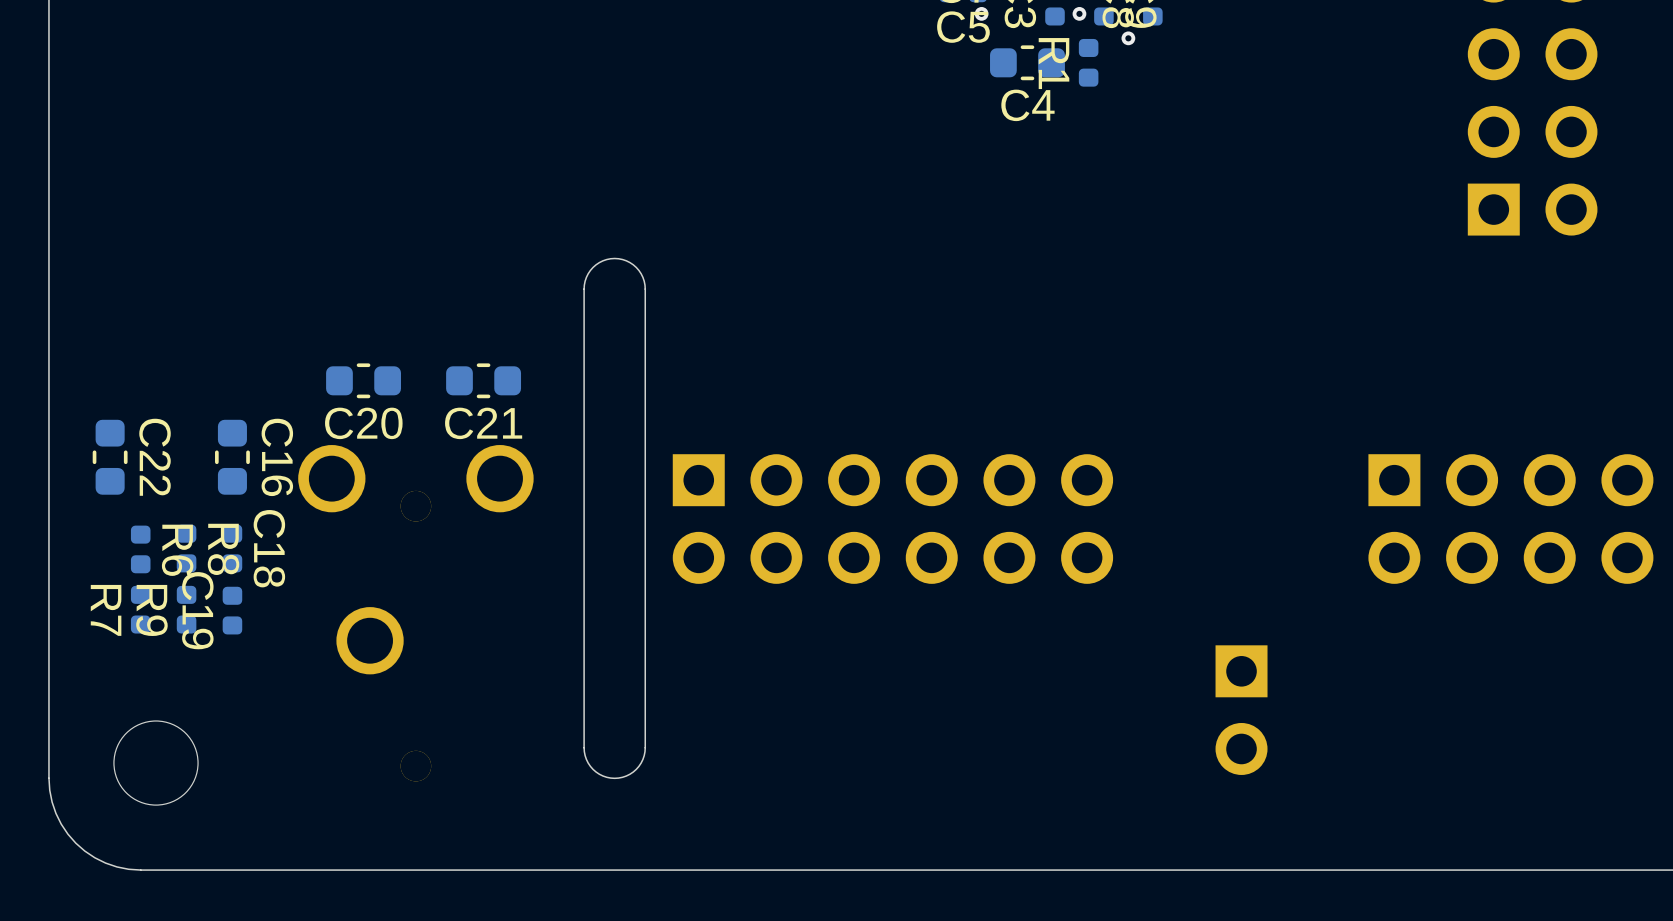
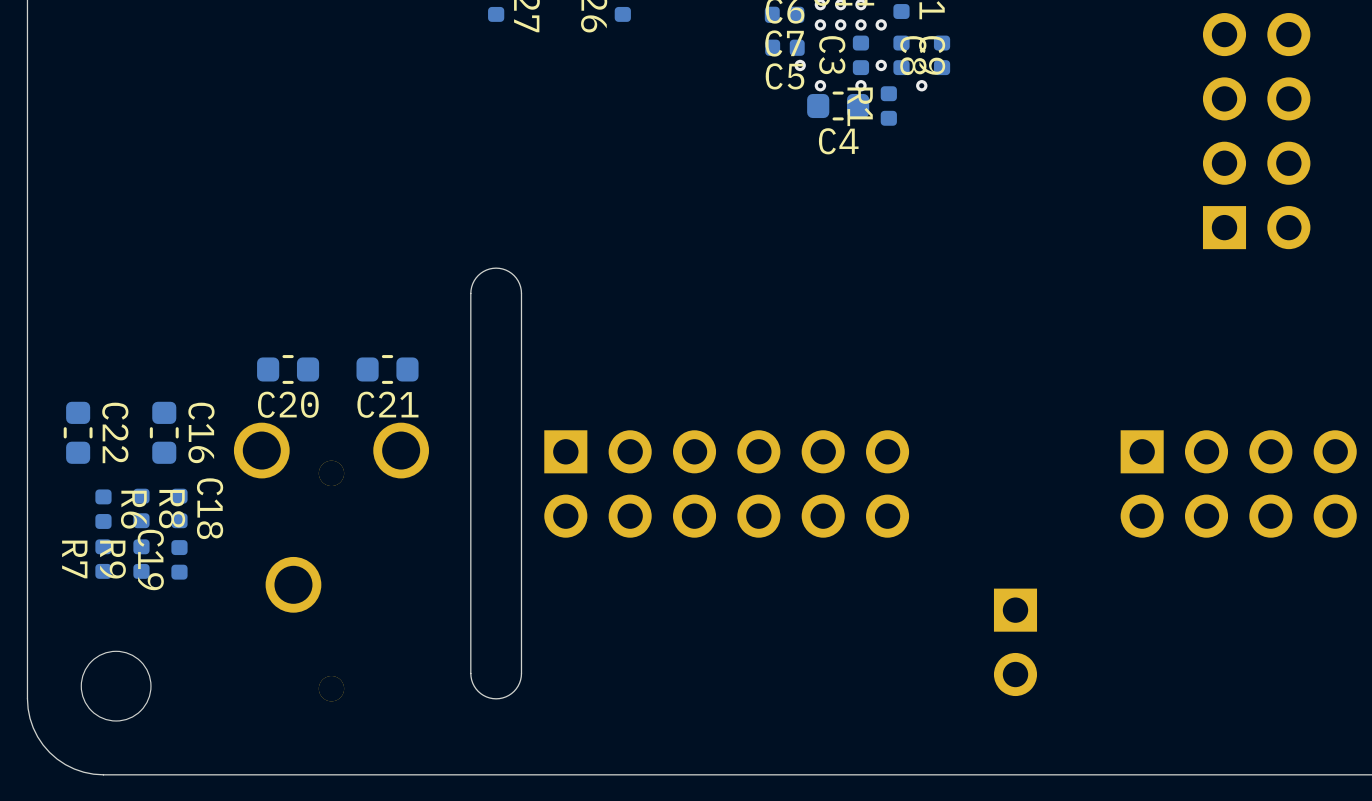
via: none -> (820, 85)
via: none -> (860, 85)
C16 position: (232, 457) -> (164, 432)

